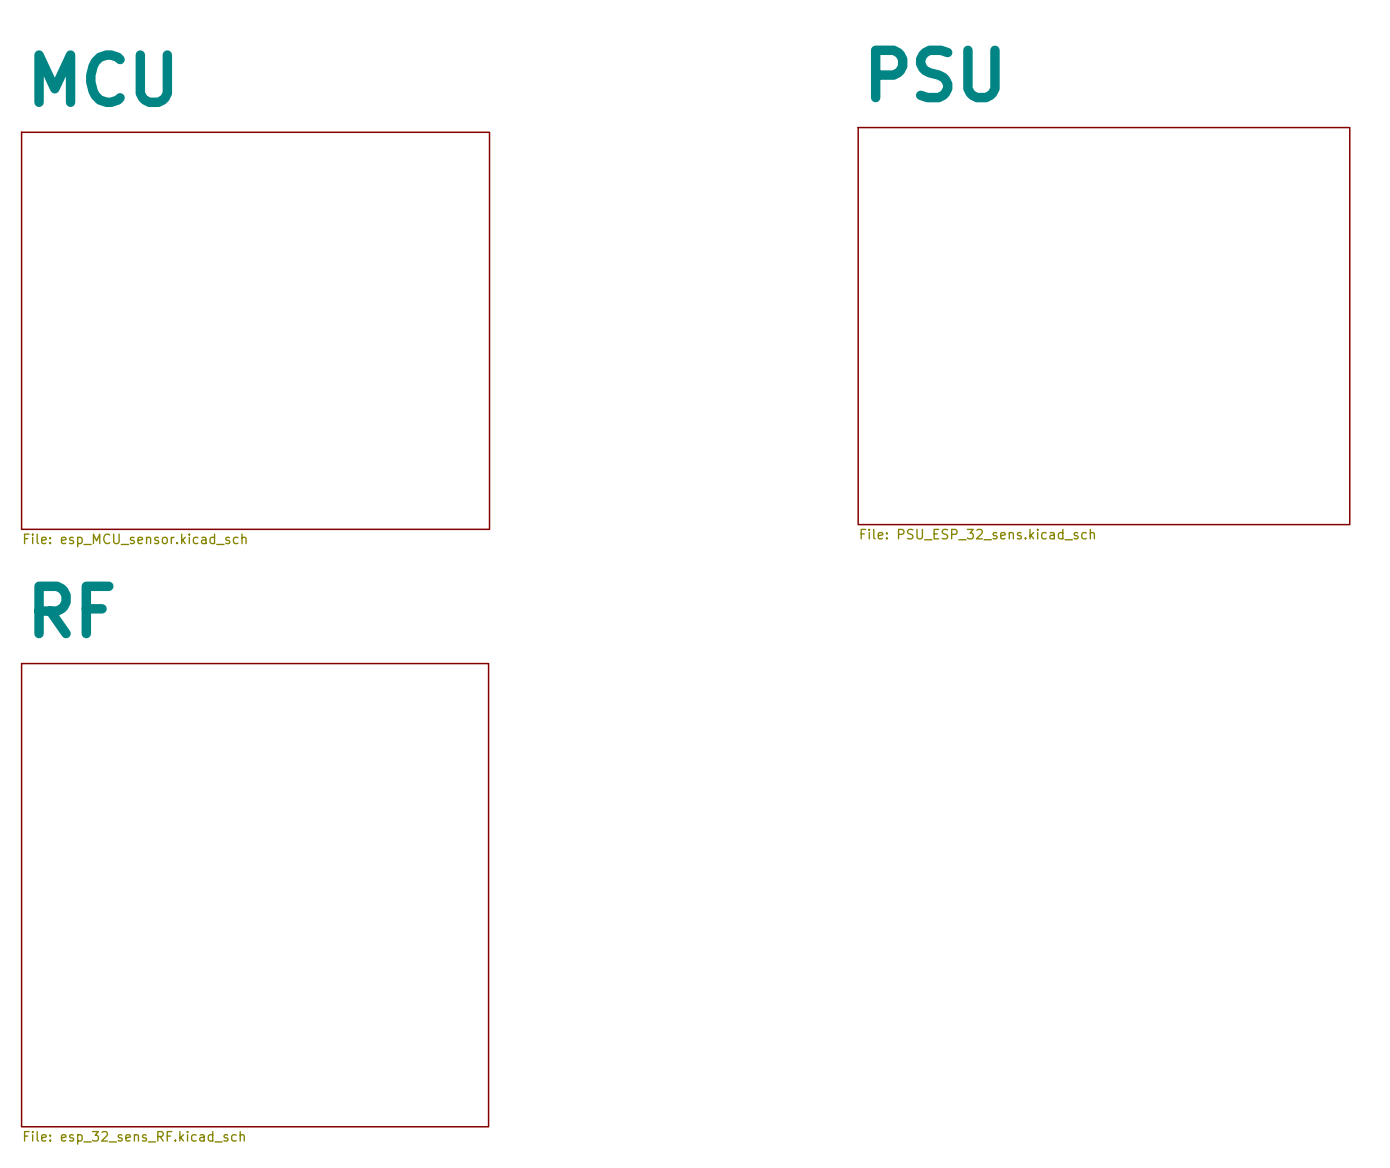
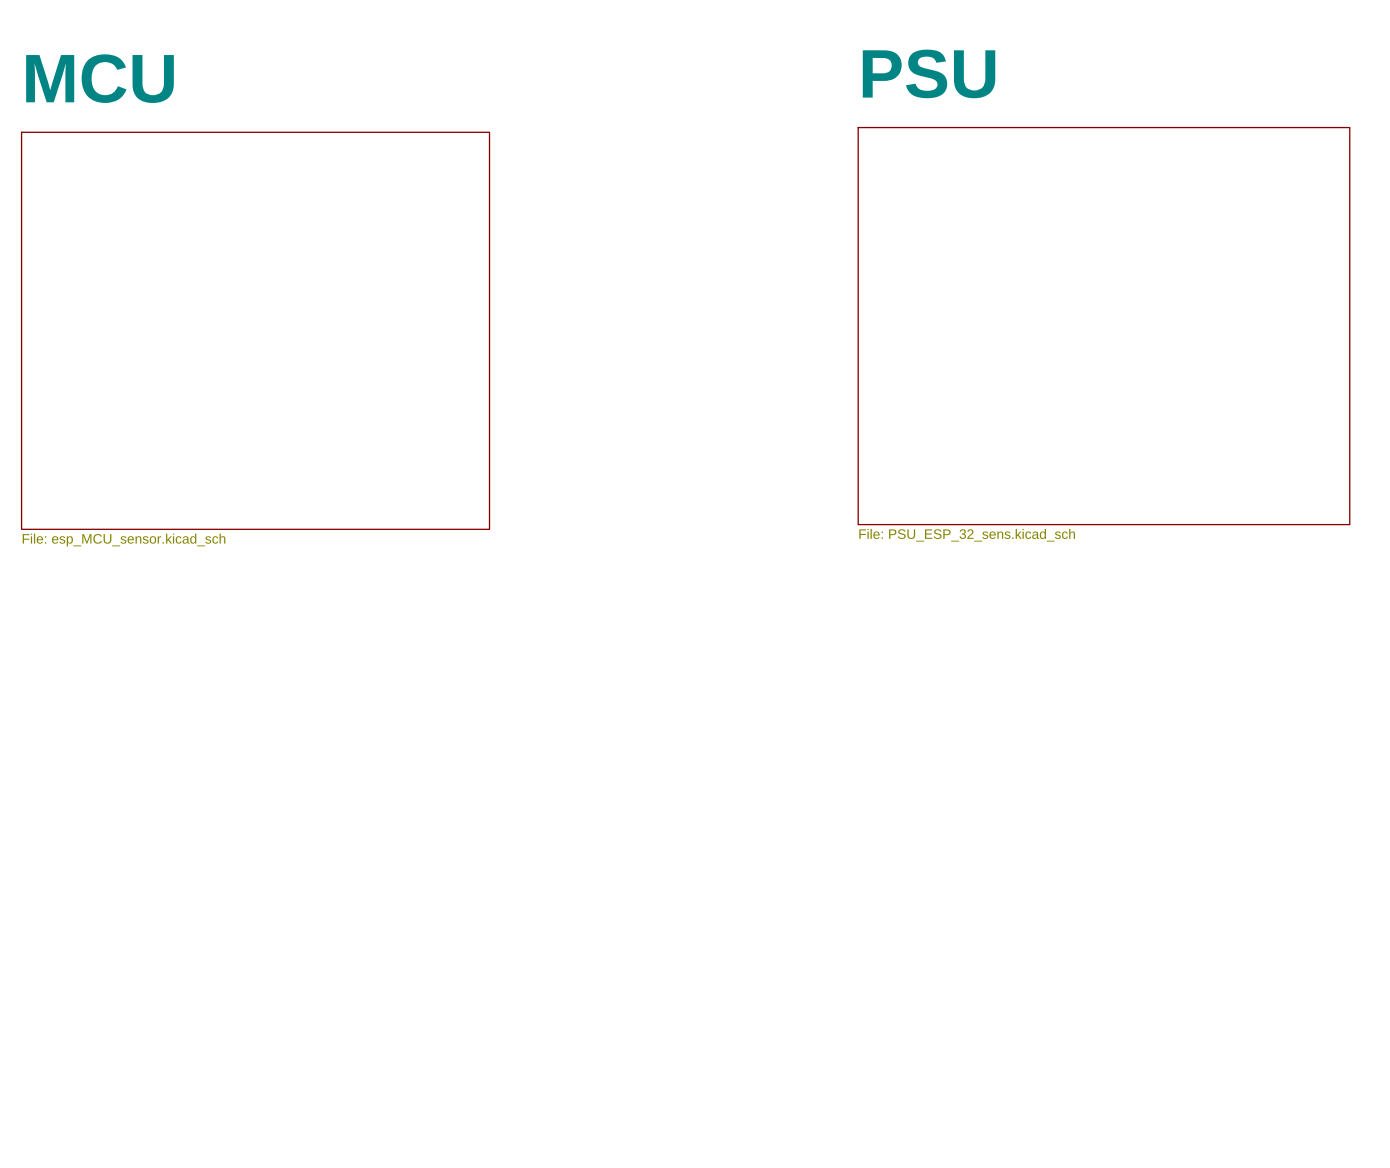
sheet RF: File: esp_32_sens_RF.kicad_sch (255, 895) -> none

